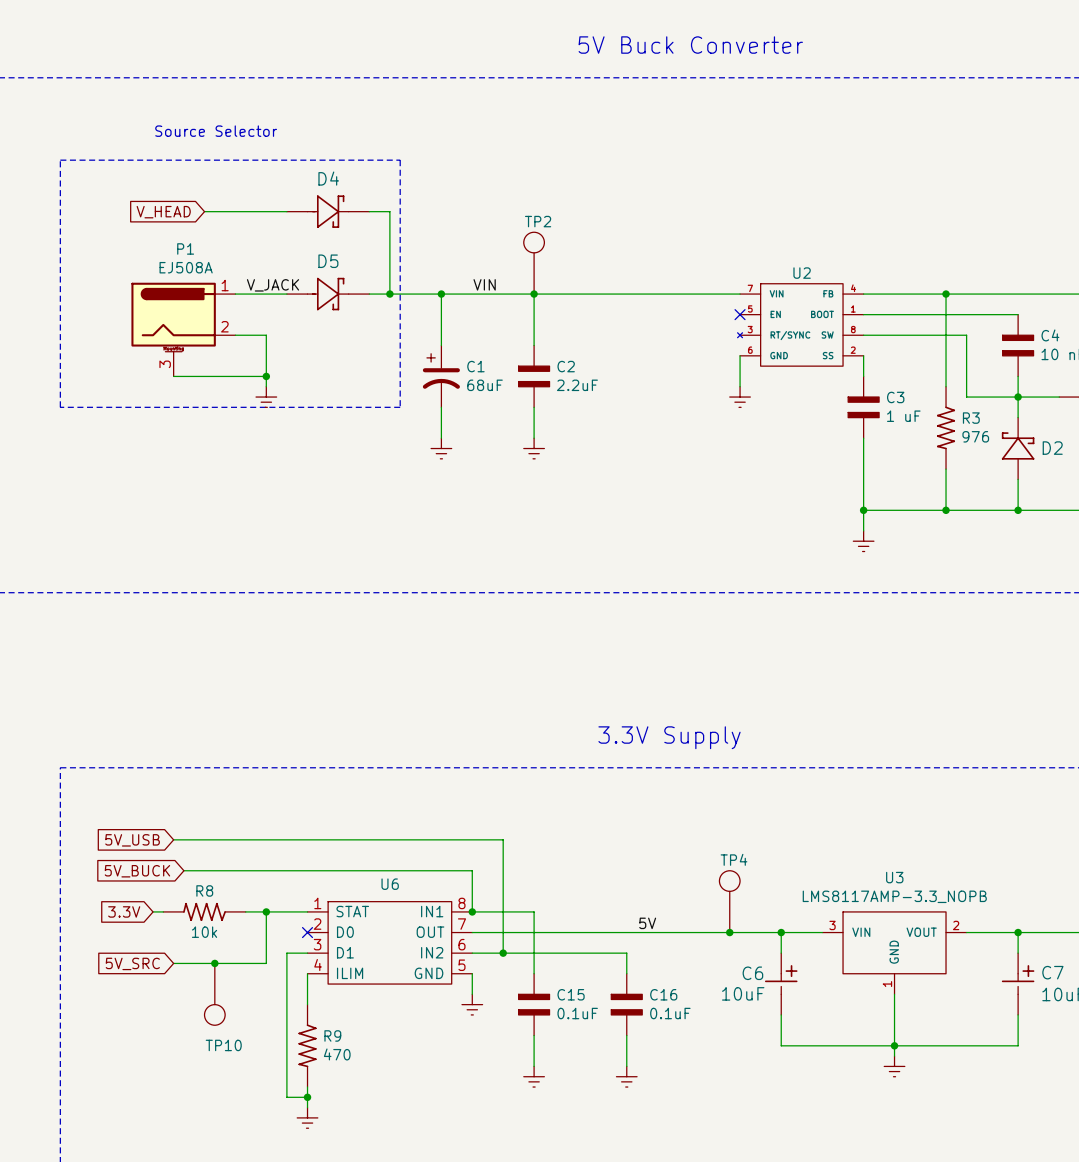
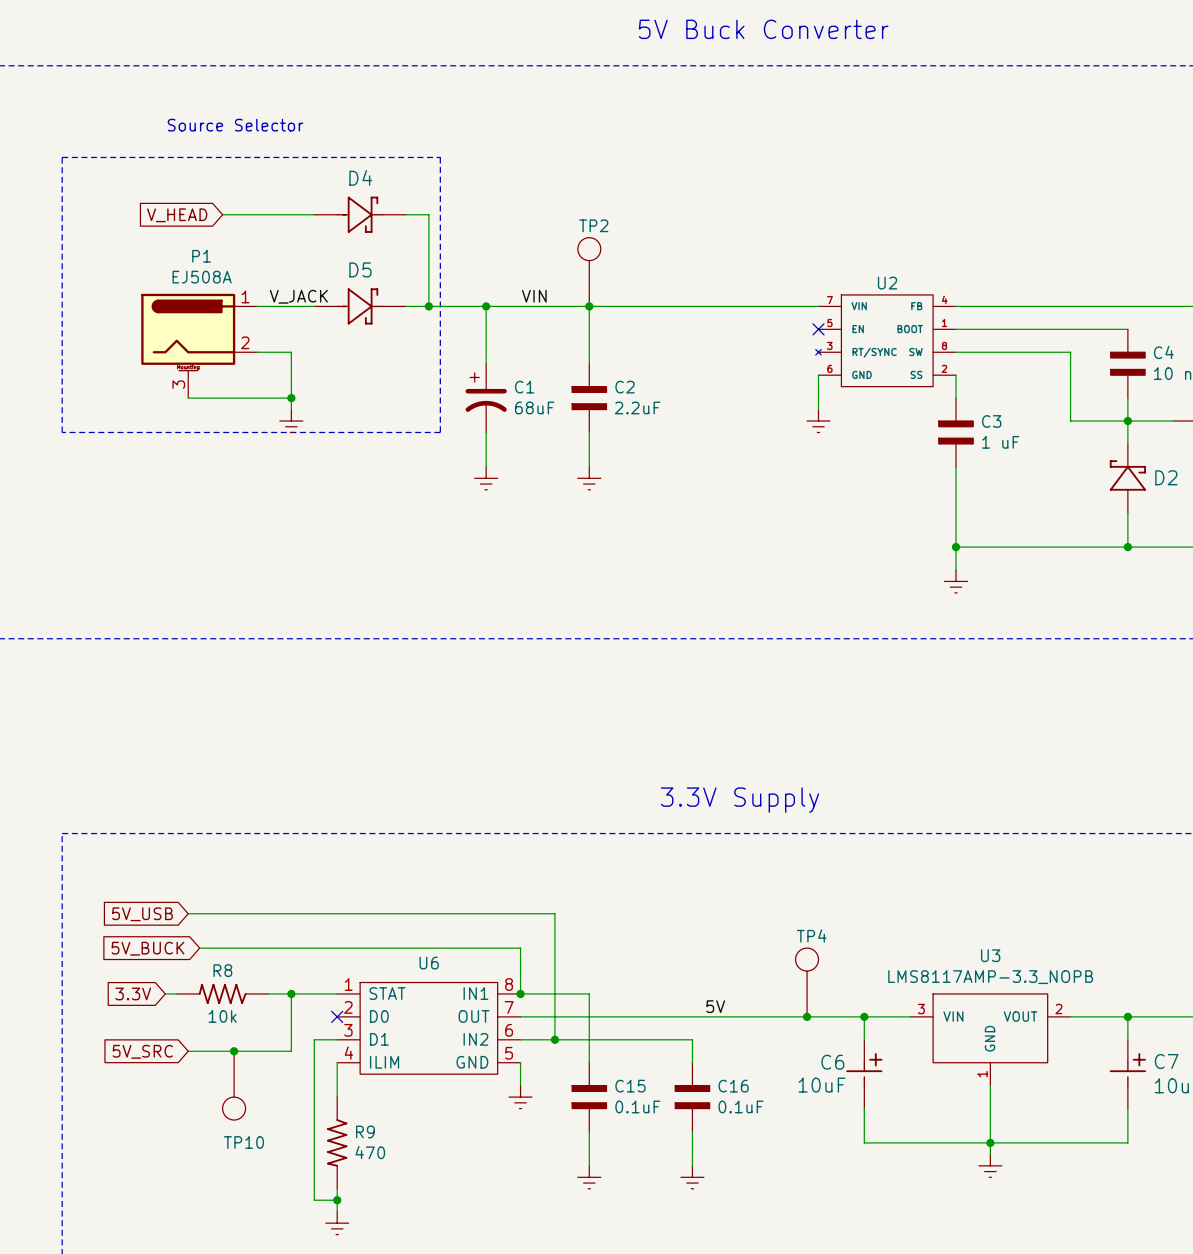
wire: (946, 294) (946, 386) -> none
junction: (946, 294) -> none
R3: 976 (946, 427) -> none
wire: (946, 469) (946, 510) -> none
junction: (946, 510) -> none

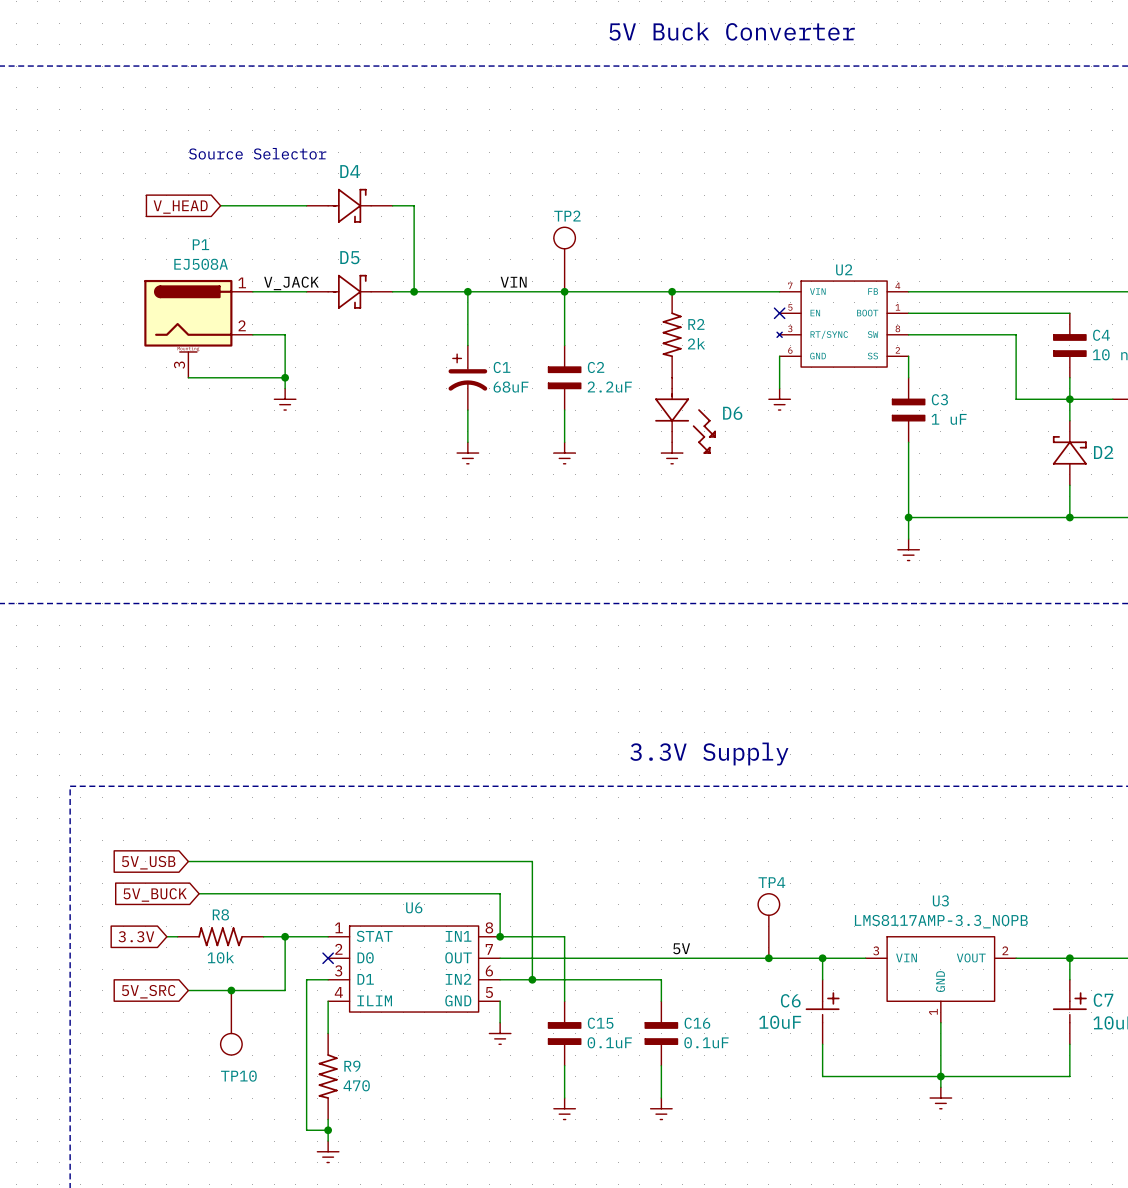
text position: Source Selector (235, 125) -> Source Selector (257, 153)
line: (62, 157) (62, 432) (440, 432) (440, 157) (62, 157) -> none
junction: none -> (672, 291)
R2: none -> 2k (672, 334)
D6: none -> (685, 415)
power symbol: none -> (672, 453)

